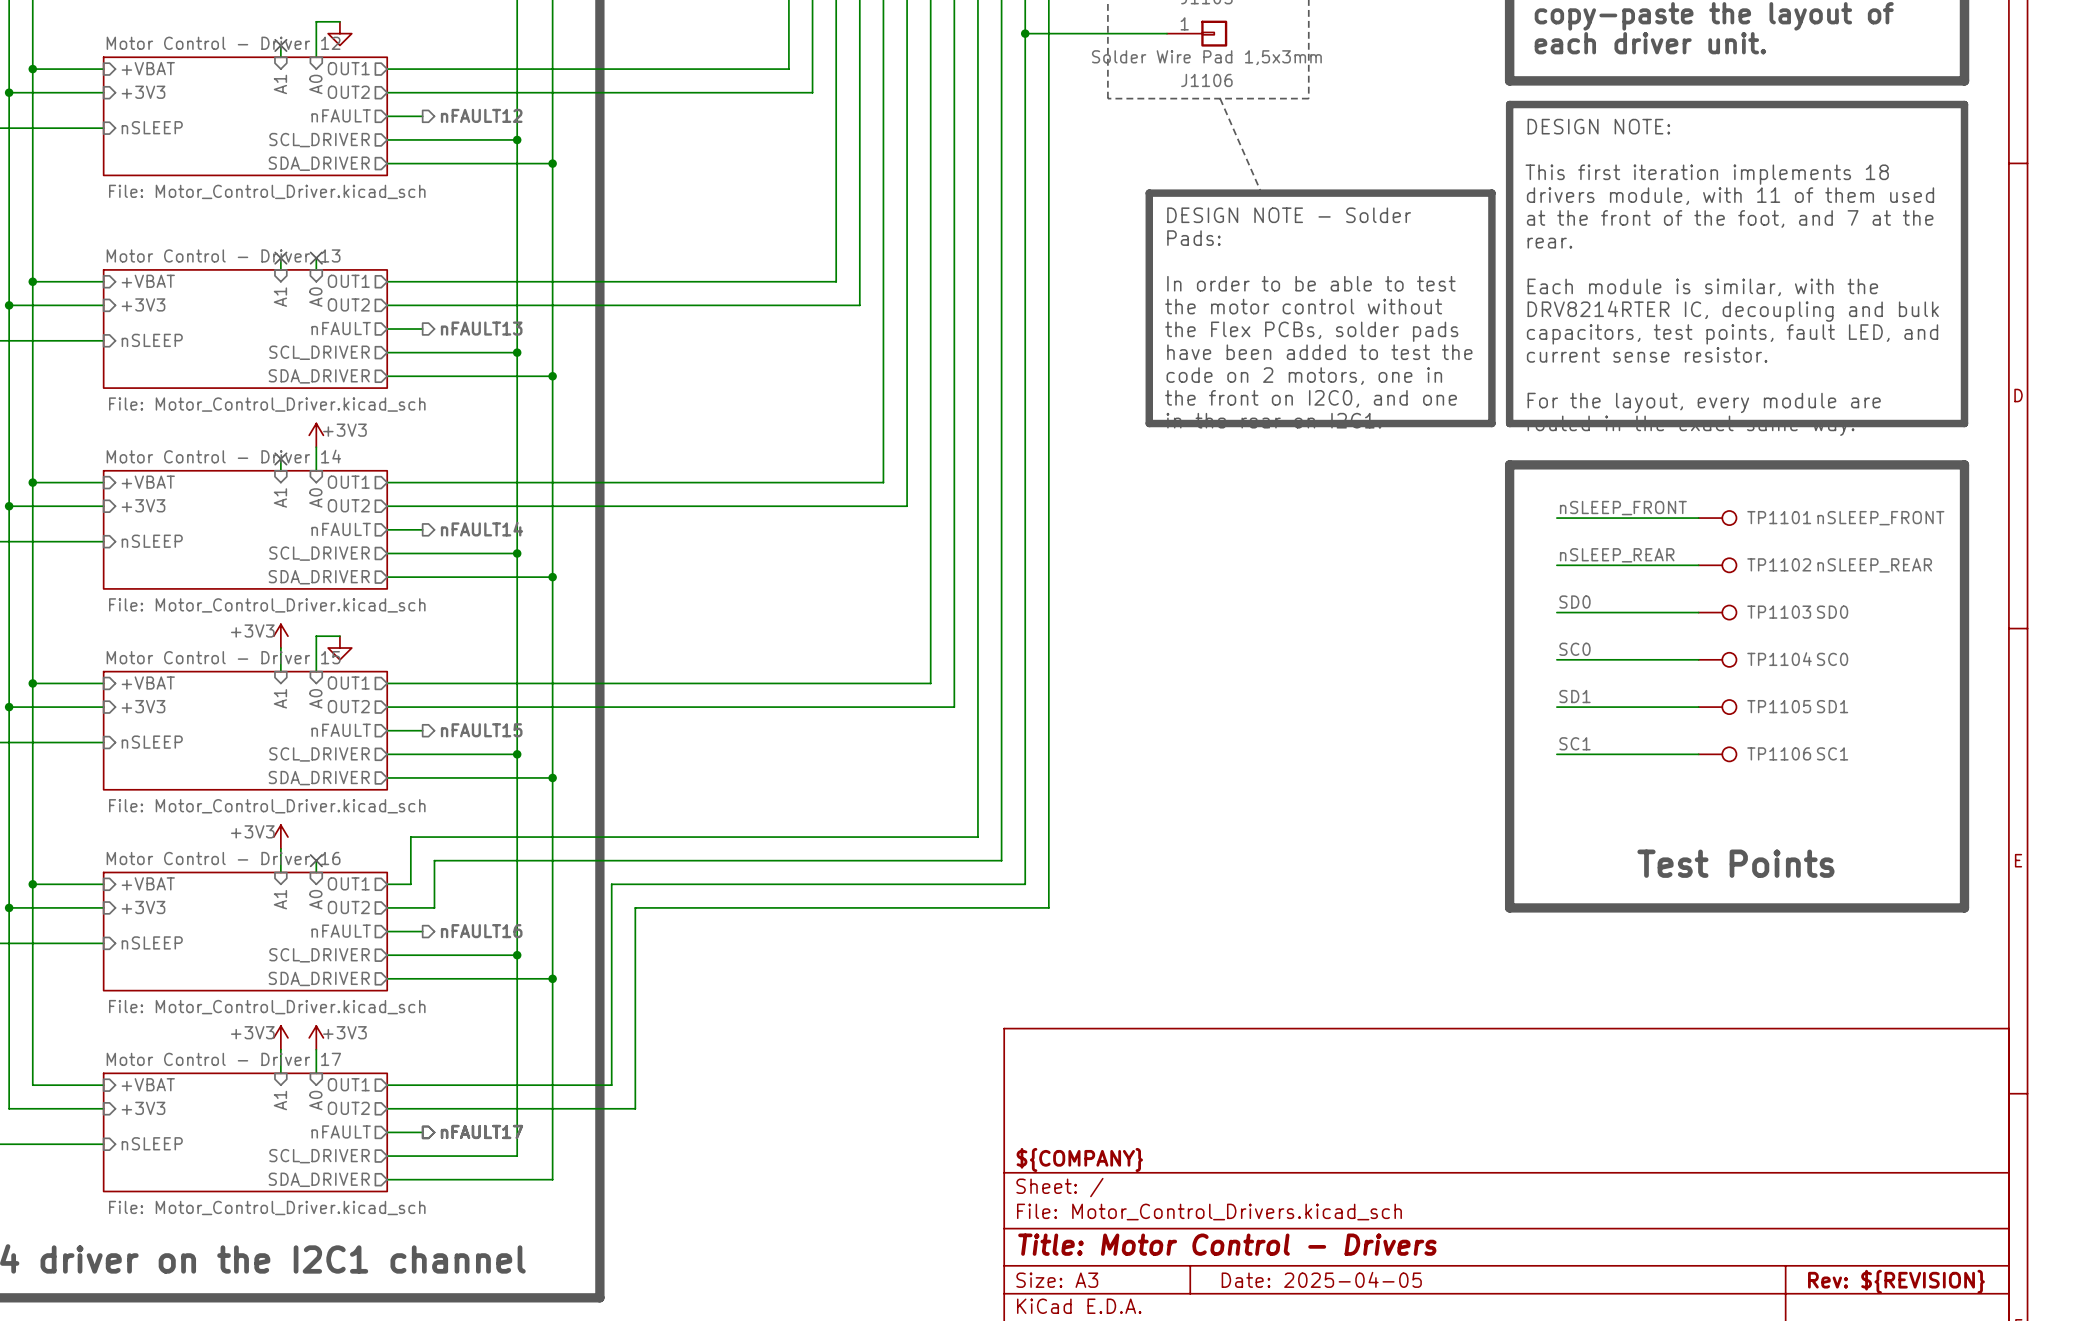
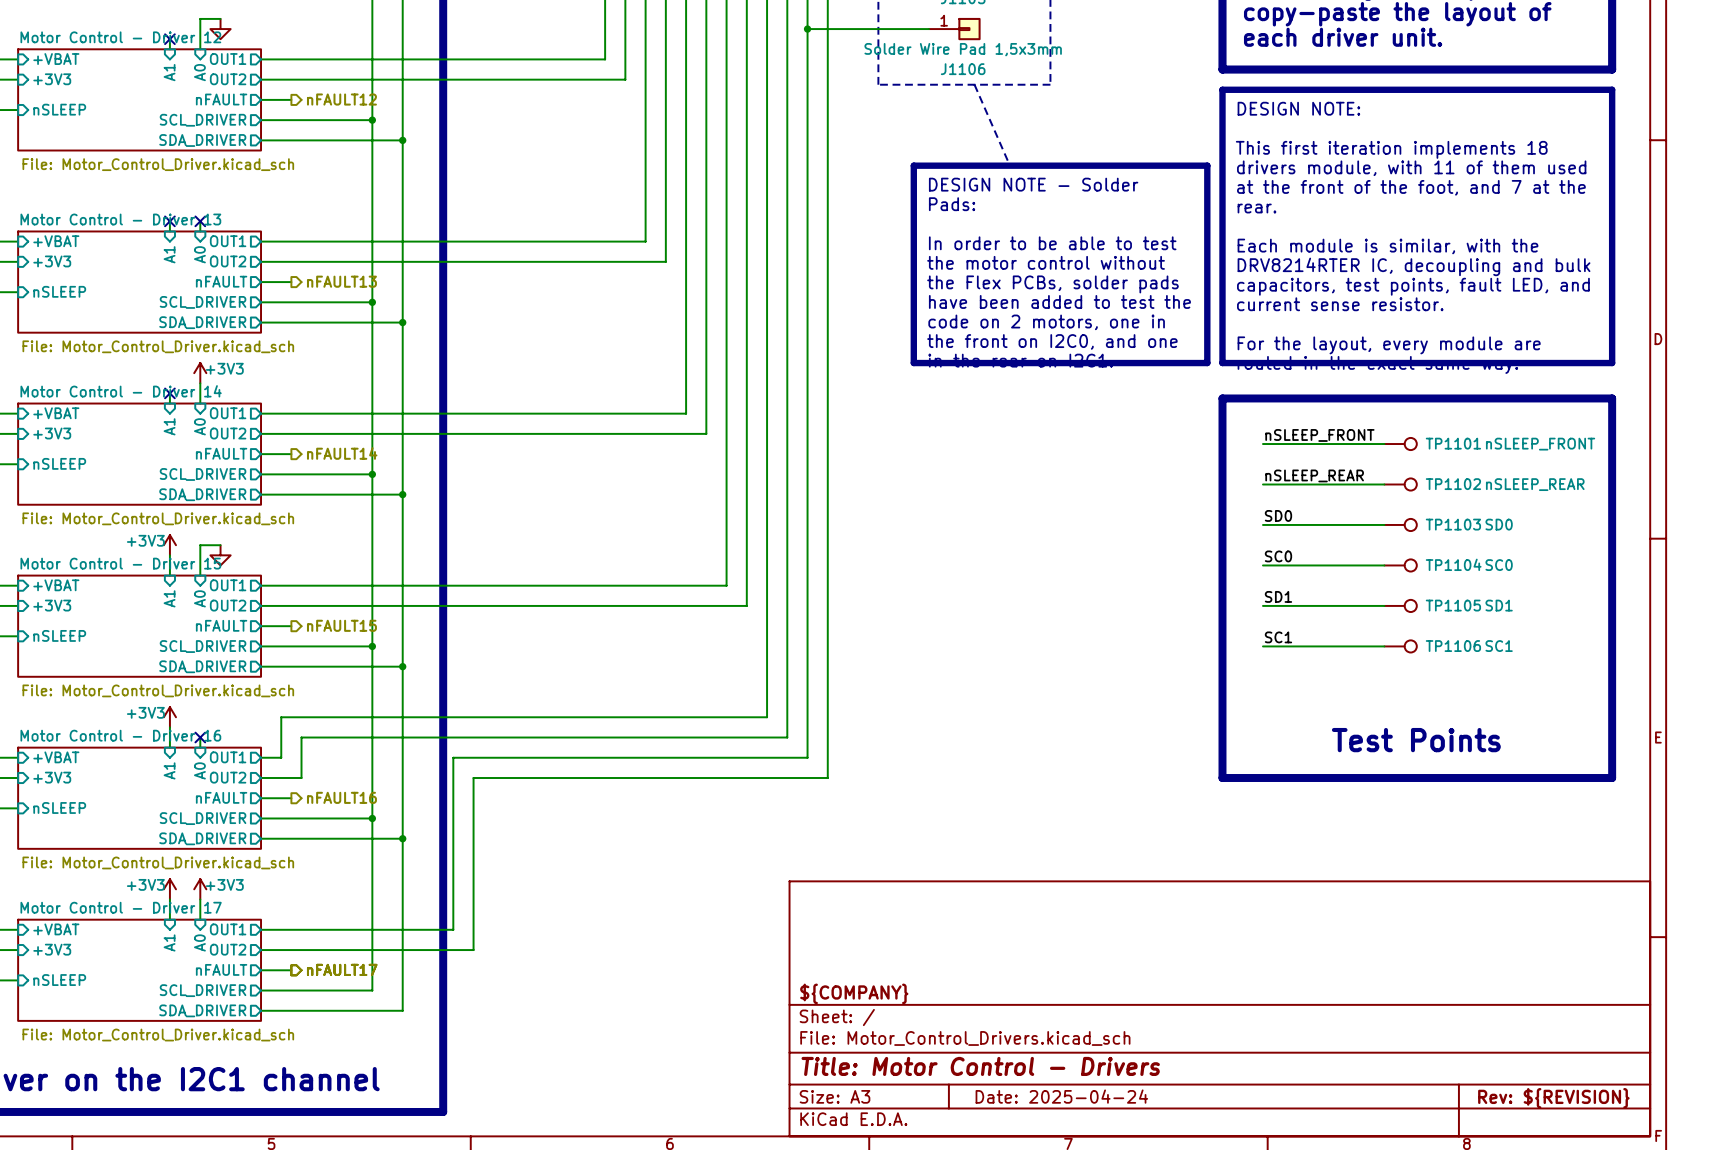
title block: Date: 2025-04-05 (1321, 1279) -> Date: 2025-04-24 (1061, 1096)

